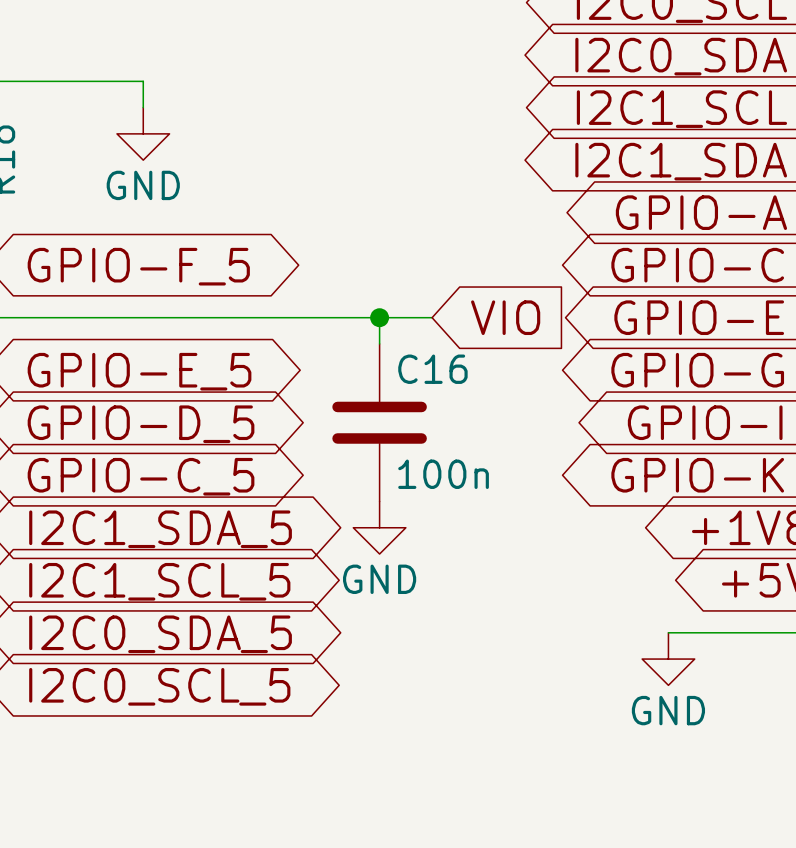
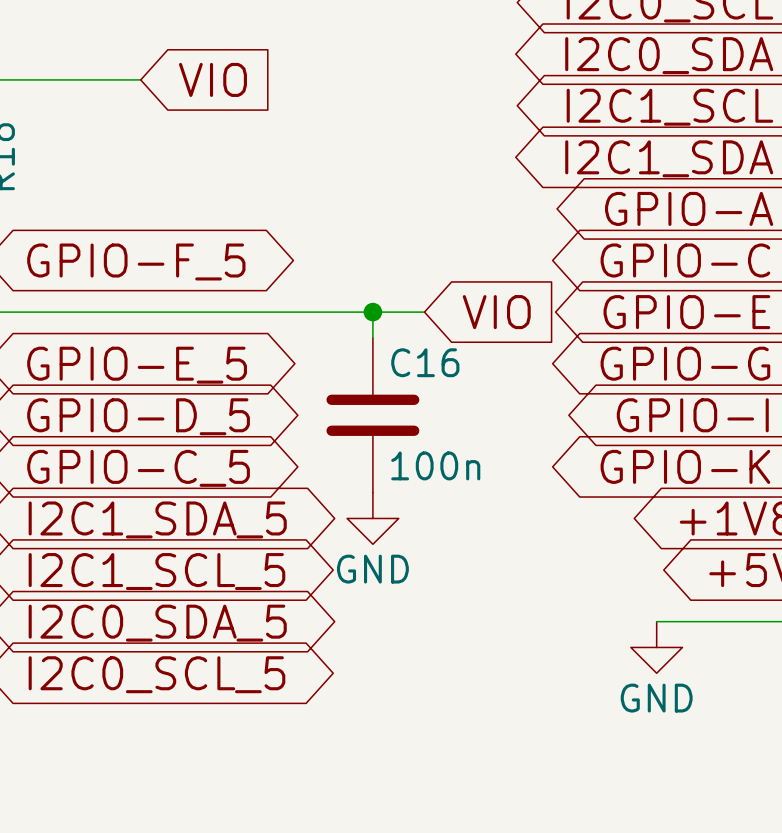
wire: (143, 81) (143, 107) -> none
global label: none -> VIO (212, 79)
power symbol: GND (143, 133) -> none

